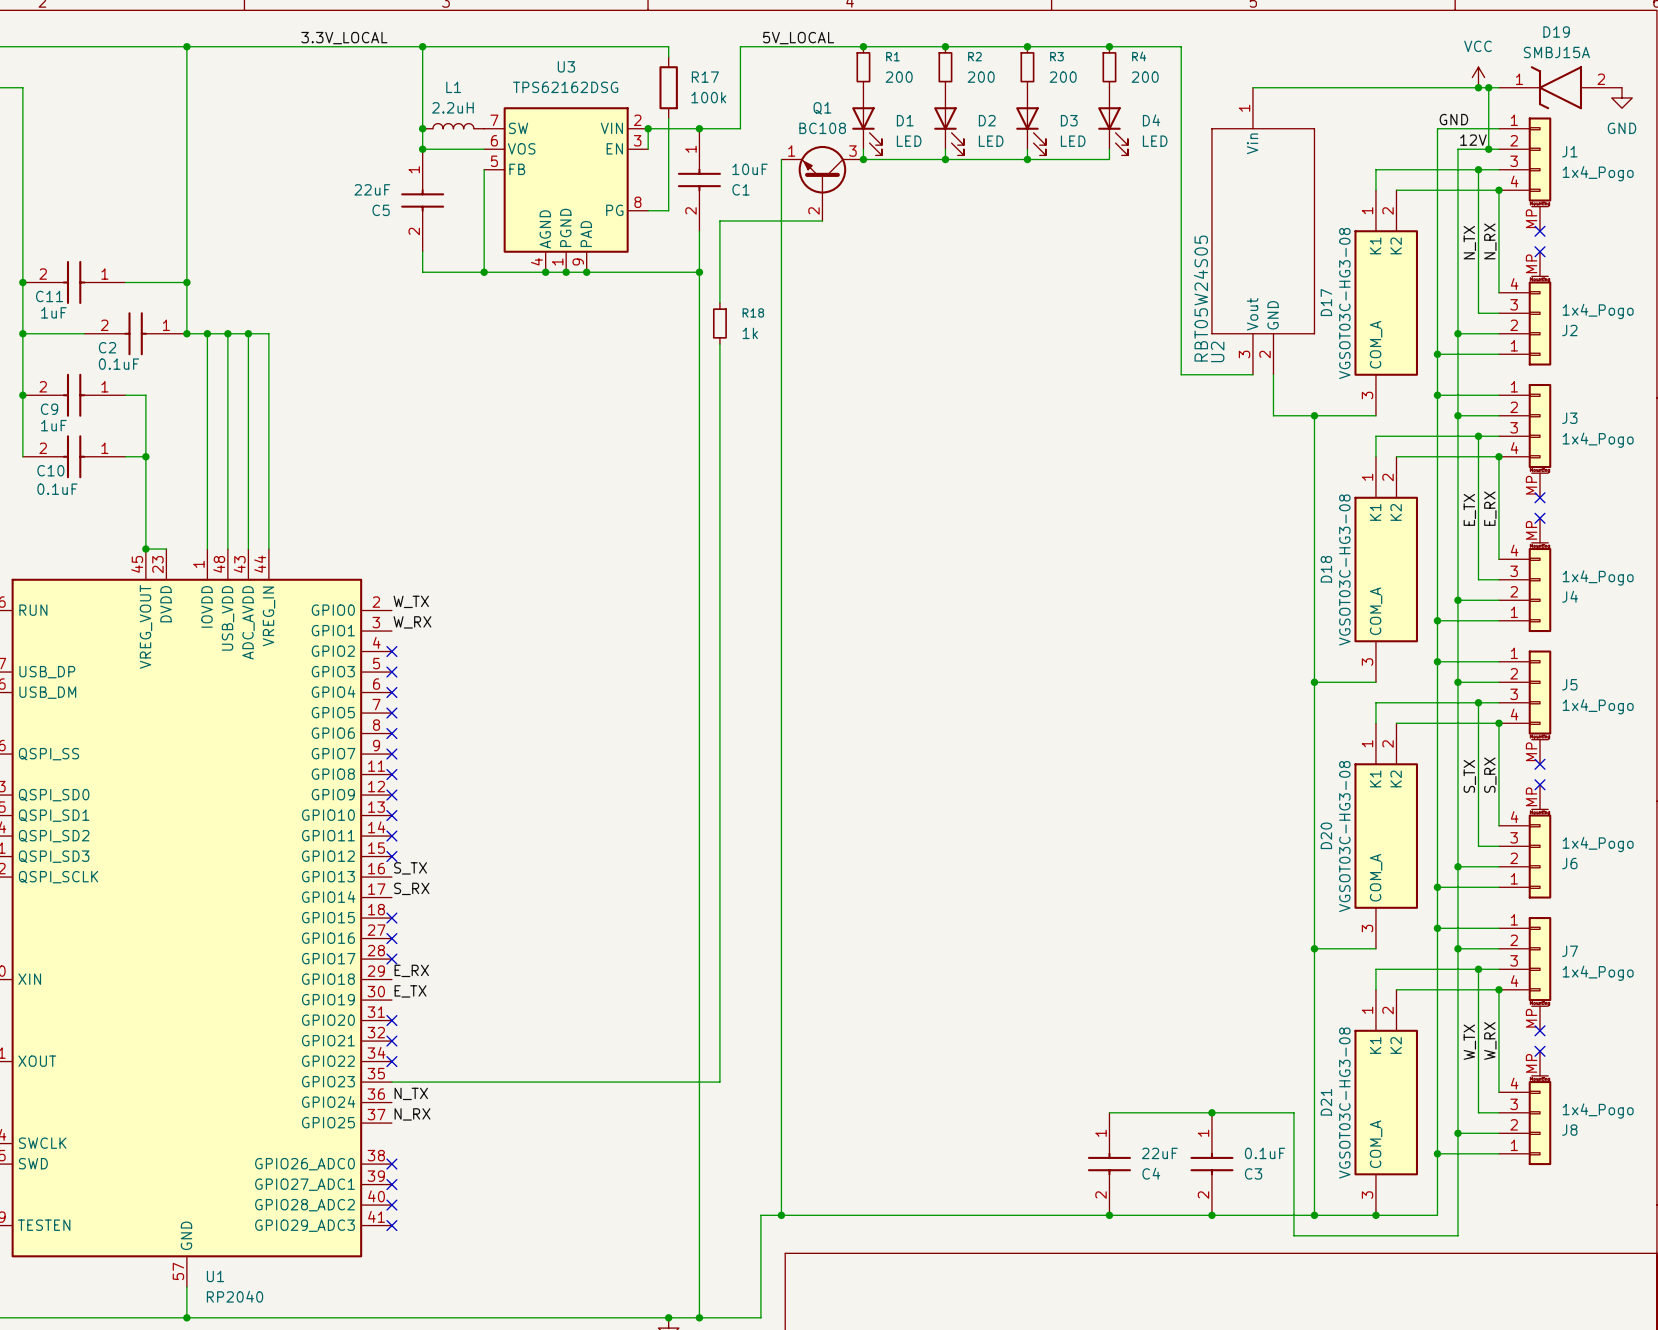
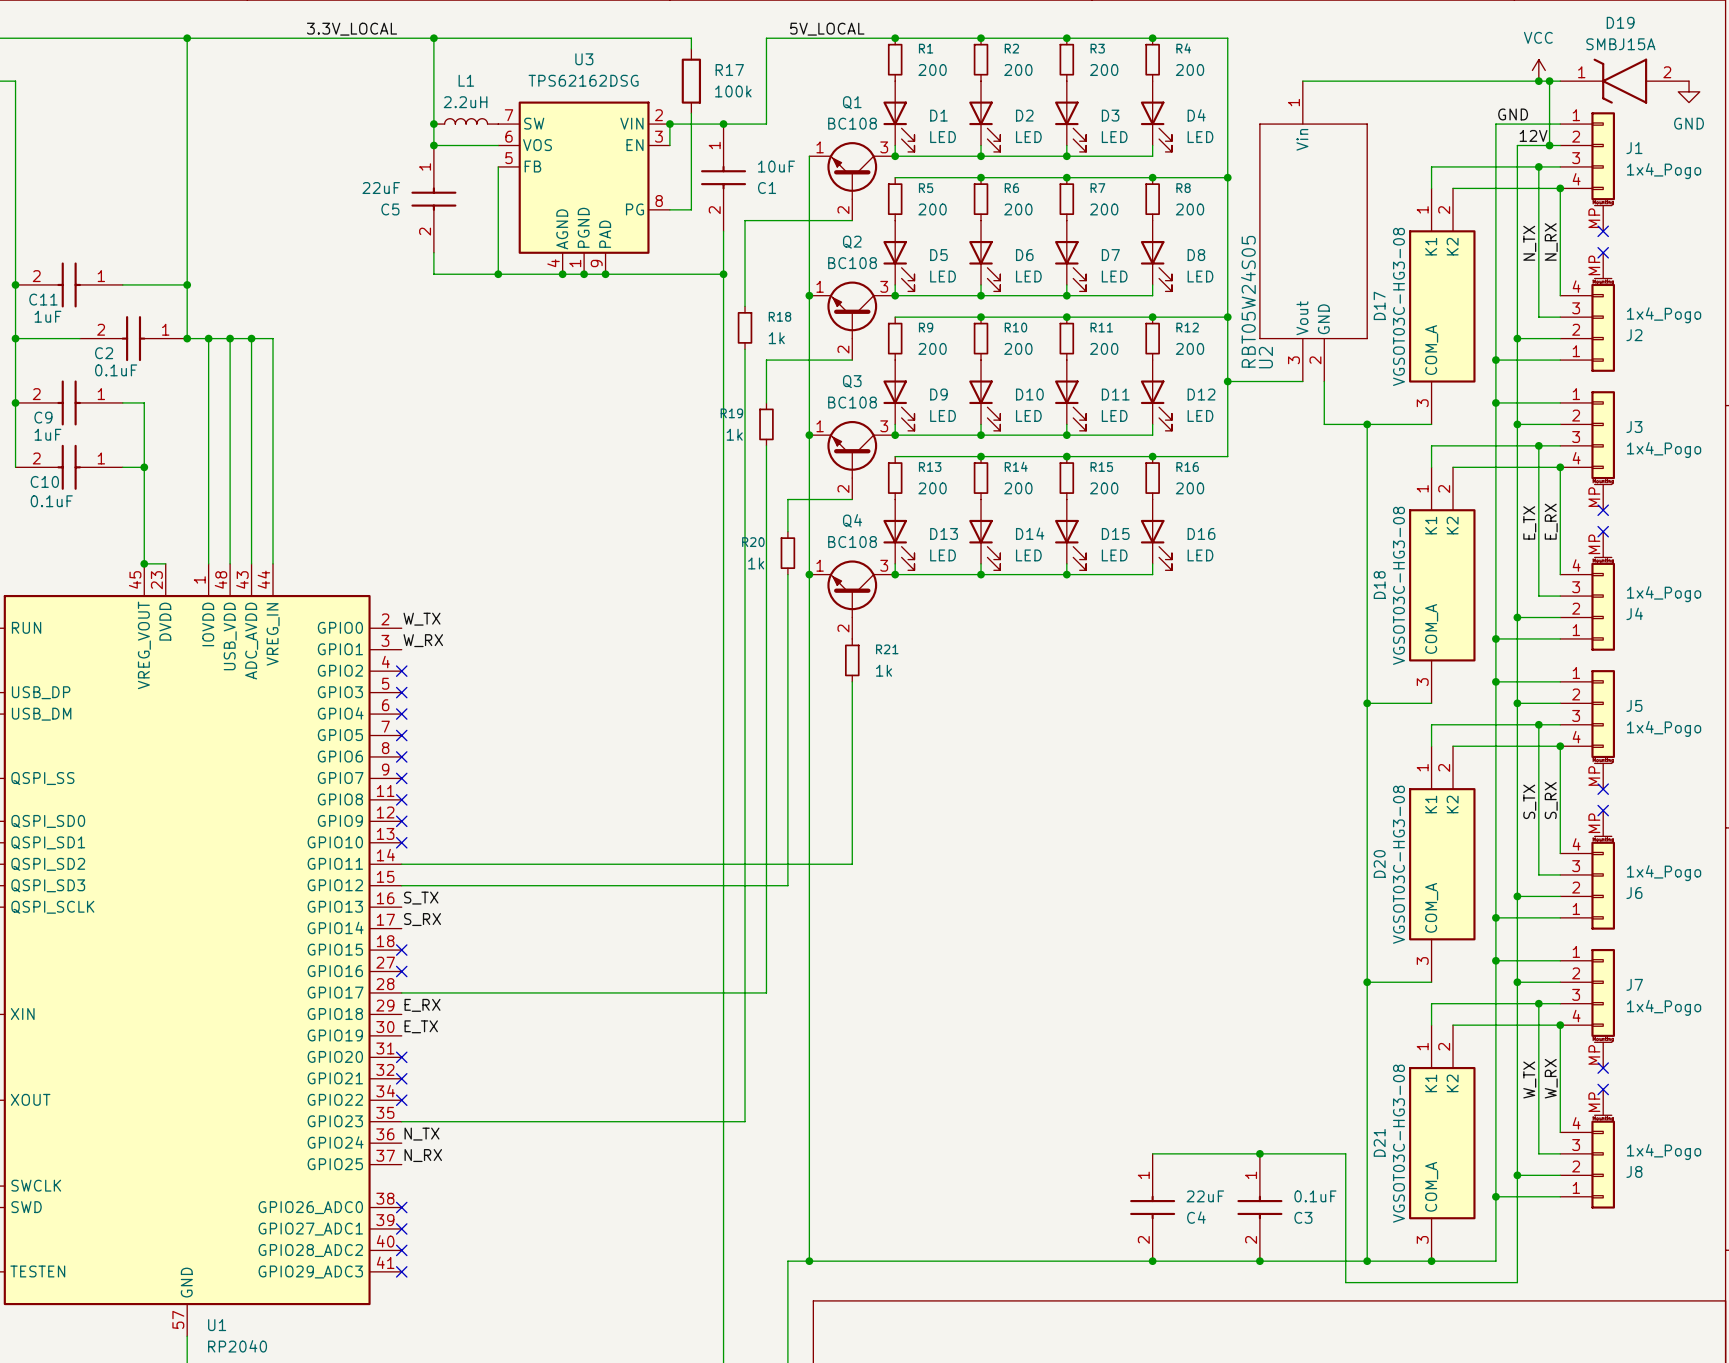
wire: none -> (895, 177) (1227, 177)
junction: none -> (981, 177)
junction: none -> (1066, 177)
junction: none -> (1152, 177)
junction: none -> (1227, 177)
R5: none -> 200 (895, 199)
R6: none -> 200 (981, 199)
R7: none -> 200 (1066, 199)
R8: none -> 200 (1152, 199)
D5: none -> LED (898, 255)
D6: none -> LED (984, 255)
D7: none -> LED (1070, 255)
D8: none -> LED (1156, 255)
wire: none -> (895, 284) (895, 295) (1152, 295) (1152, 284)
wire: none -> (981, 284) (981, 295)
wire: none -> (1066, 284) (1066, 295)
junction: none -> (809, 295)
junction: none -> (895, 295)
junction: none -> (981, 295)
junction: none -> (1066, 295)
wire: none -> (895, 317) (1227, 317)
junction: none -> (981, 317)
junction: none -> (1066, 317)
junction: none -> (1152, 317)
junction: none -> (1227, 317)
Q2: none -> BC108 (852, 320)
R9: none -> 200 (895, 338)
R10: none -> 200 (981, 338)
R11: none -> 200 (1066, 338)
R12: none -> 200 (1152, 338)
wire: none -> (852, 360) (766, 360) (766, 402)
wire: none -> (1227, 381) (1227, 456) (895, 456)
junction: none -> (1227, 381)
D9: none -> LED (898, 395)
D10: none -> LED (984, 395)
D11: none -> LED (1070, 395)
D12: none -> LED (1156, 395)
R19: none -> 1k (766, 424)
wire: none -> (895, 424) (895, 435) (1152, 435) (1152, 424)
wire: none -> (981, 424) (981, 435)
wire: none -> (1066, 424) (1066, 435)
junction: none -> (809, 435)
junction: none -> (895, 435)
junction: none -> (981, 435)
junction: none -> (1066, 435)
wire: none -> (766, 445) (766, 992) (401, 992)
junction: none -> (981, 456)
junction: none -> (1066, 456)
junction: none -> (1152, 456)
Q3: none -> BC108 (852, 460)
R13: none -> 200 (895, 478)
R14: none -> 200 (981, 478)
R15: none -> 200 (1066, 478)
R16: none -> 200 (1152, 478)
wire: none -> (852, 499) (787, 499) (787, 531)
D13: none -> LED (898, 534)
D14: none -> LED (984, 534)
D15: none -> LED (1070, 534)
D16: none -> LED (1156, 534)
R20: none -> 1k (787, 553)
wire: none -> (895, 563) (895, 574) (1152, 574) (1152, 563)
wire: none -> (981, 563) (981, 574)
wire: none -> (1066, 563) (1066, 574)
wire: none -> (787, 574) (787, 885) (401, 885)
junction: none -> (809, 574)
junction: none -> (895, 574)
junction: none -> (981, 574)
junction: none -> (1066, 574)
Q4: none -> BC108 (852, 599)
R21: none -> 1k (852, 660)
wire: none -> (852, 681) (852, 864) (401, 864)
no-connect mark: (391, 836) -> none
no-connect mark: (391, 856) -> none
no-connect mark: (391, 959) -> none

